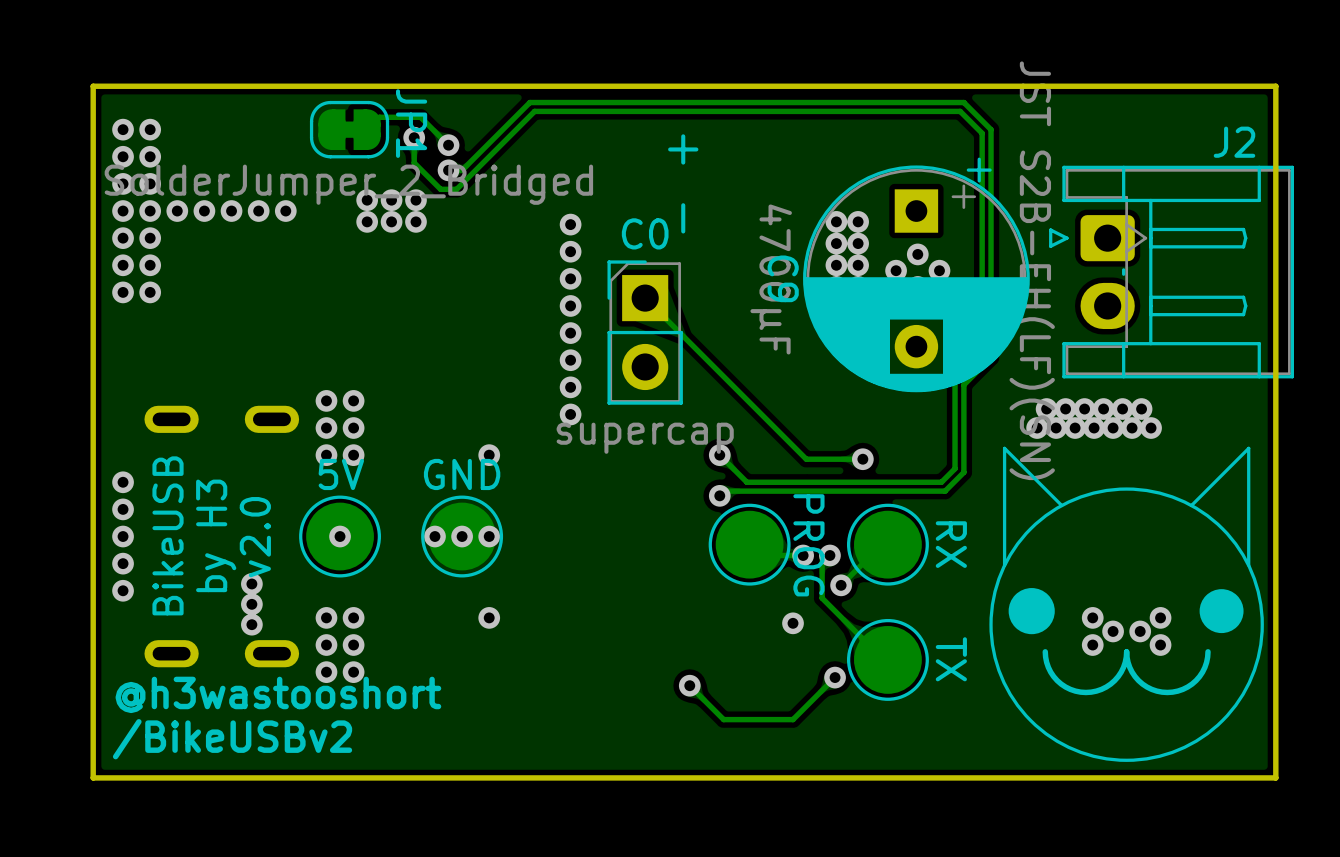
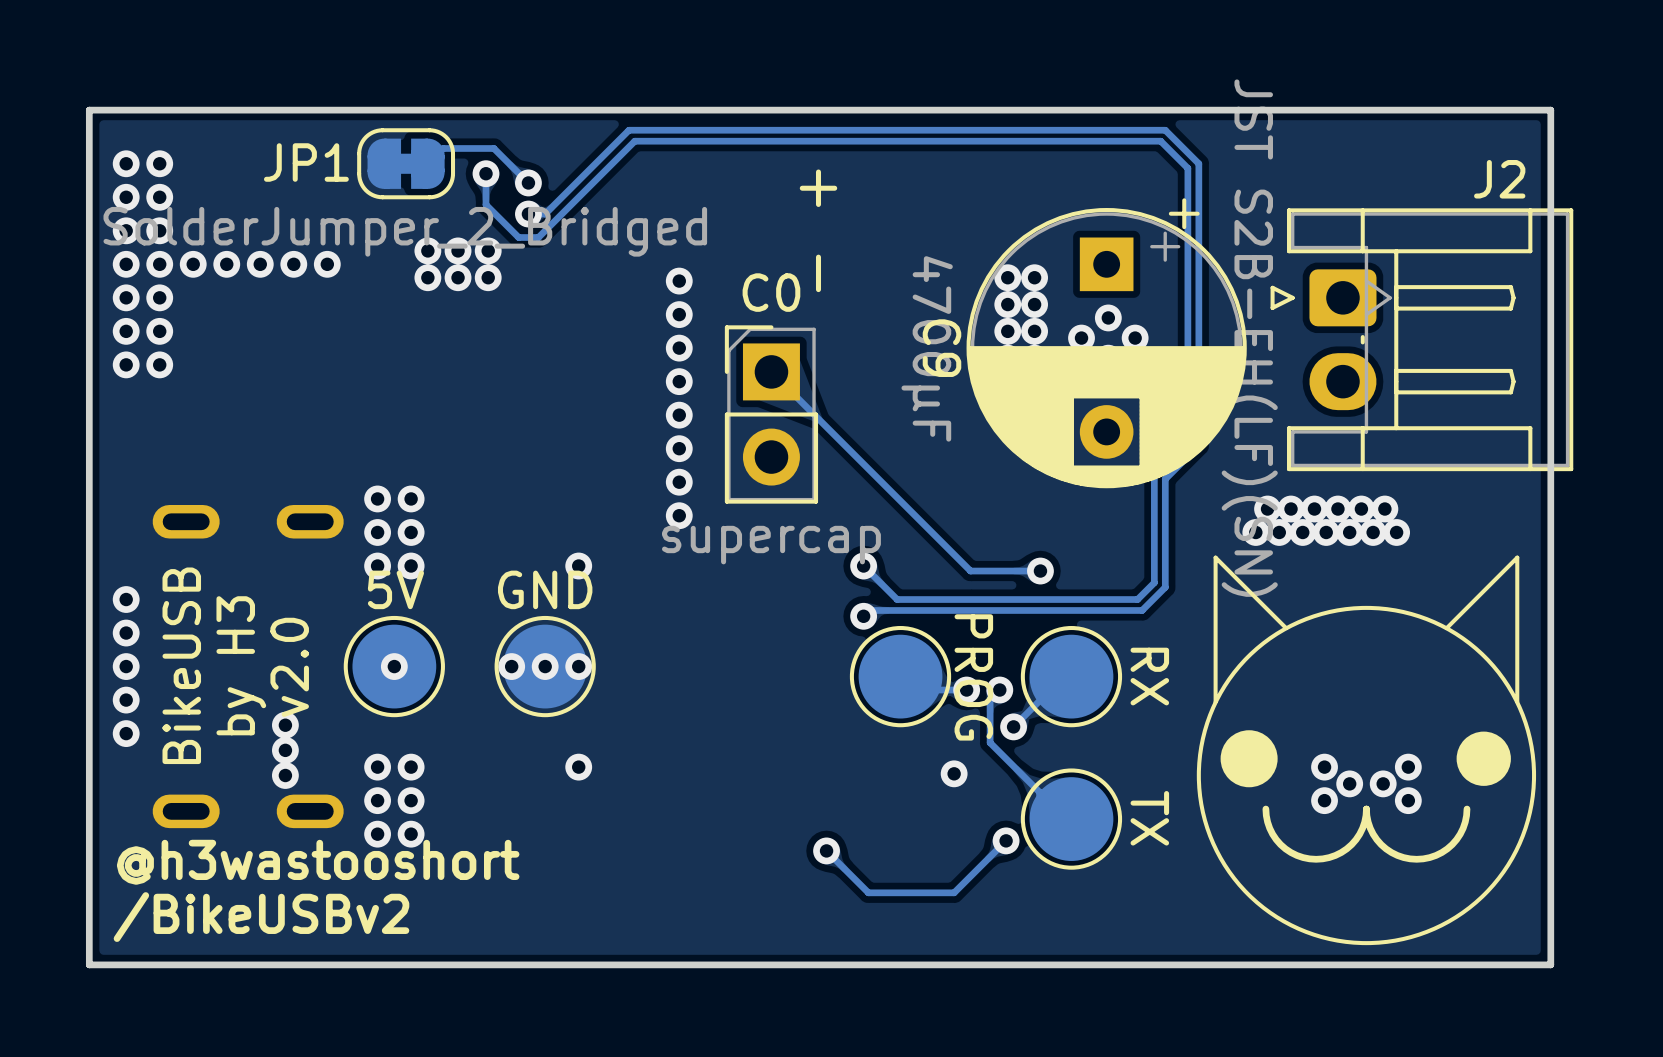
JP1 name rotation: 0° (411, 123) -> 90° counterclockwise (306, 162)
JP1 name position: JP1 (411, 123) -> JP1 (306, 162)

